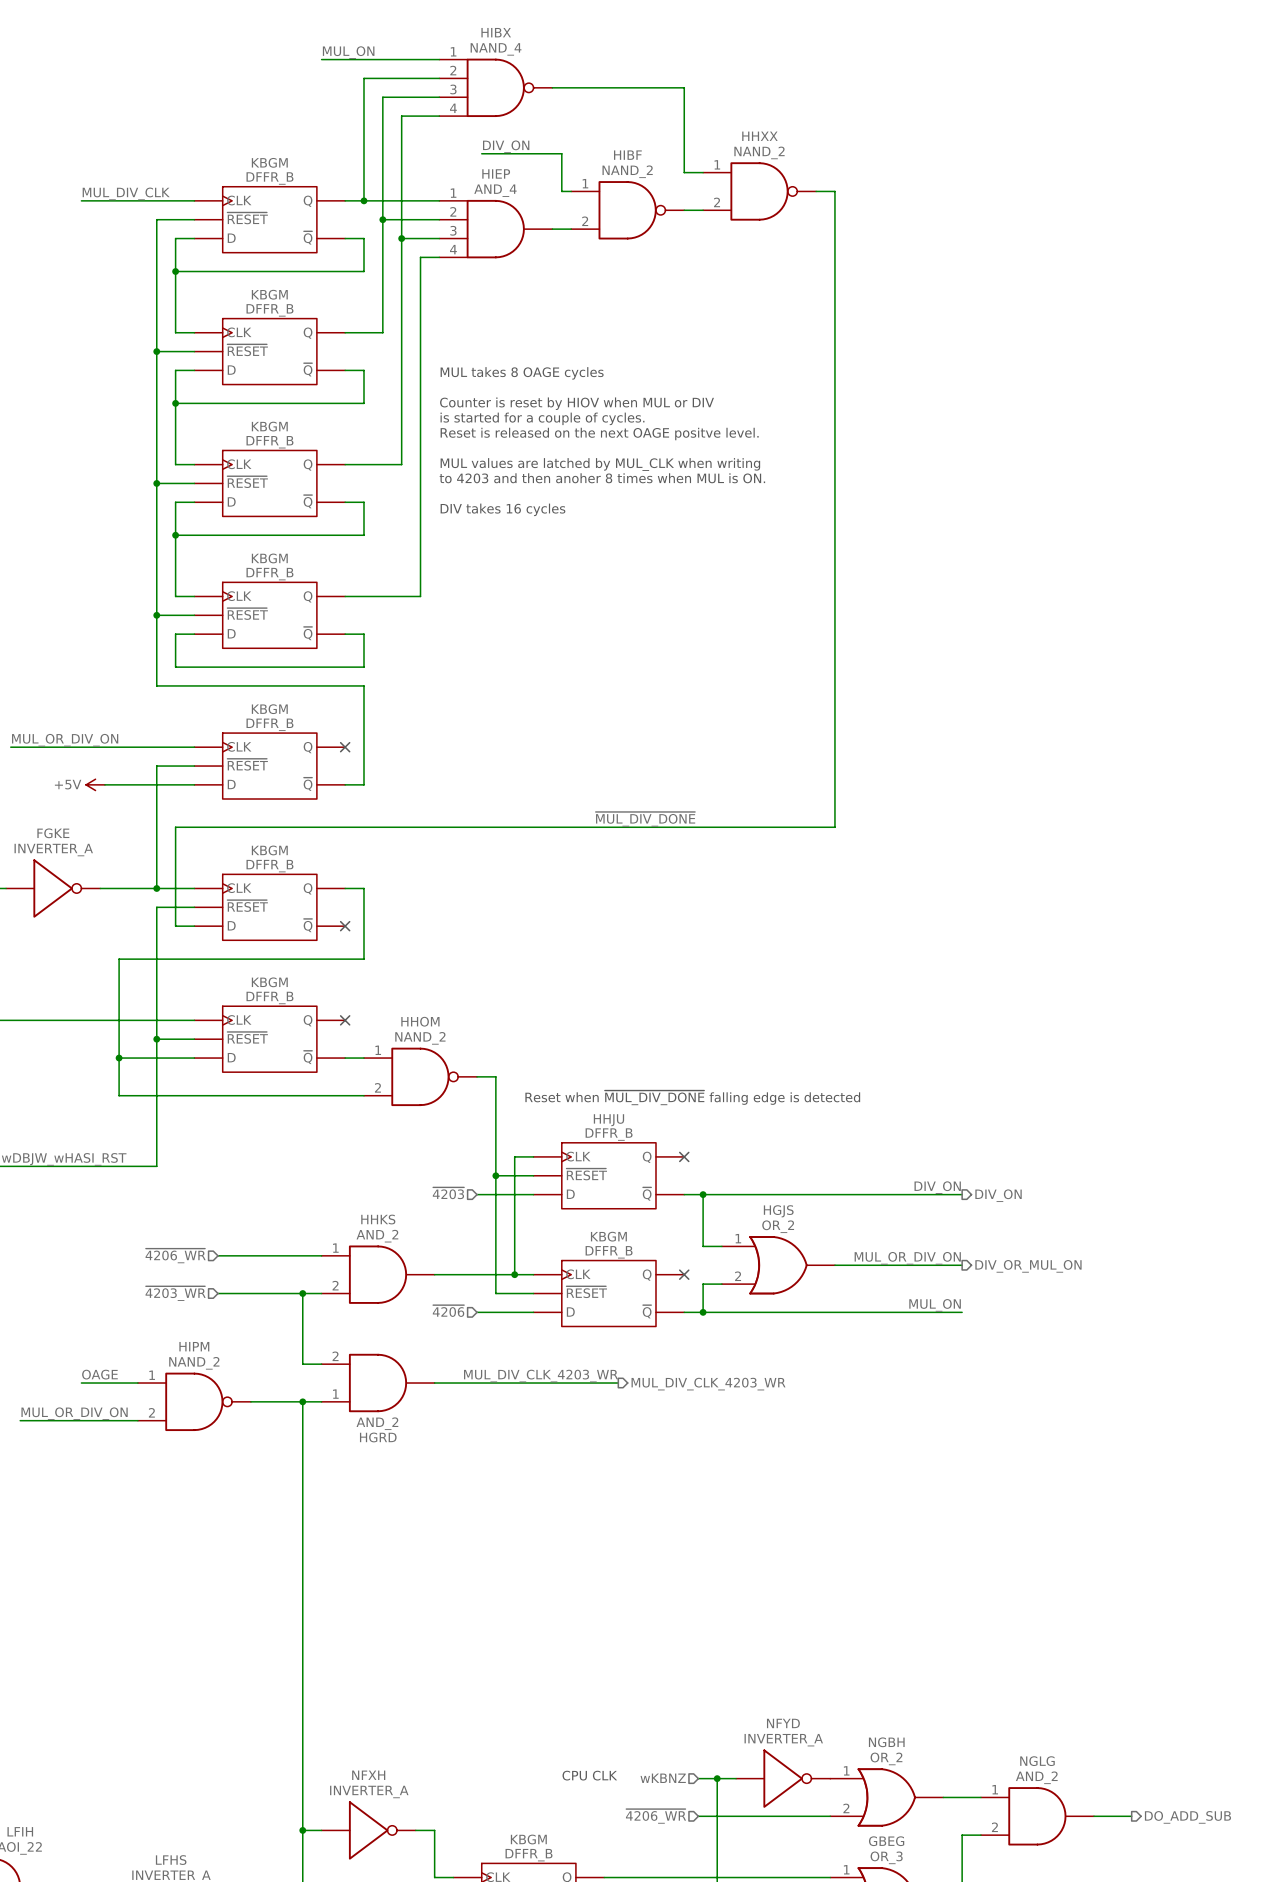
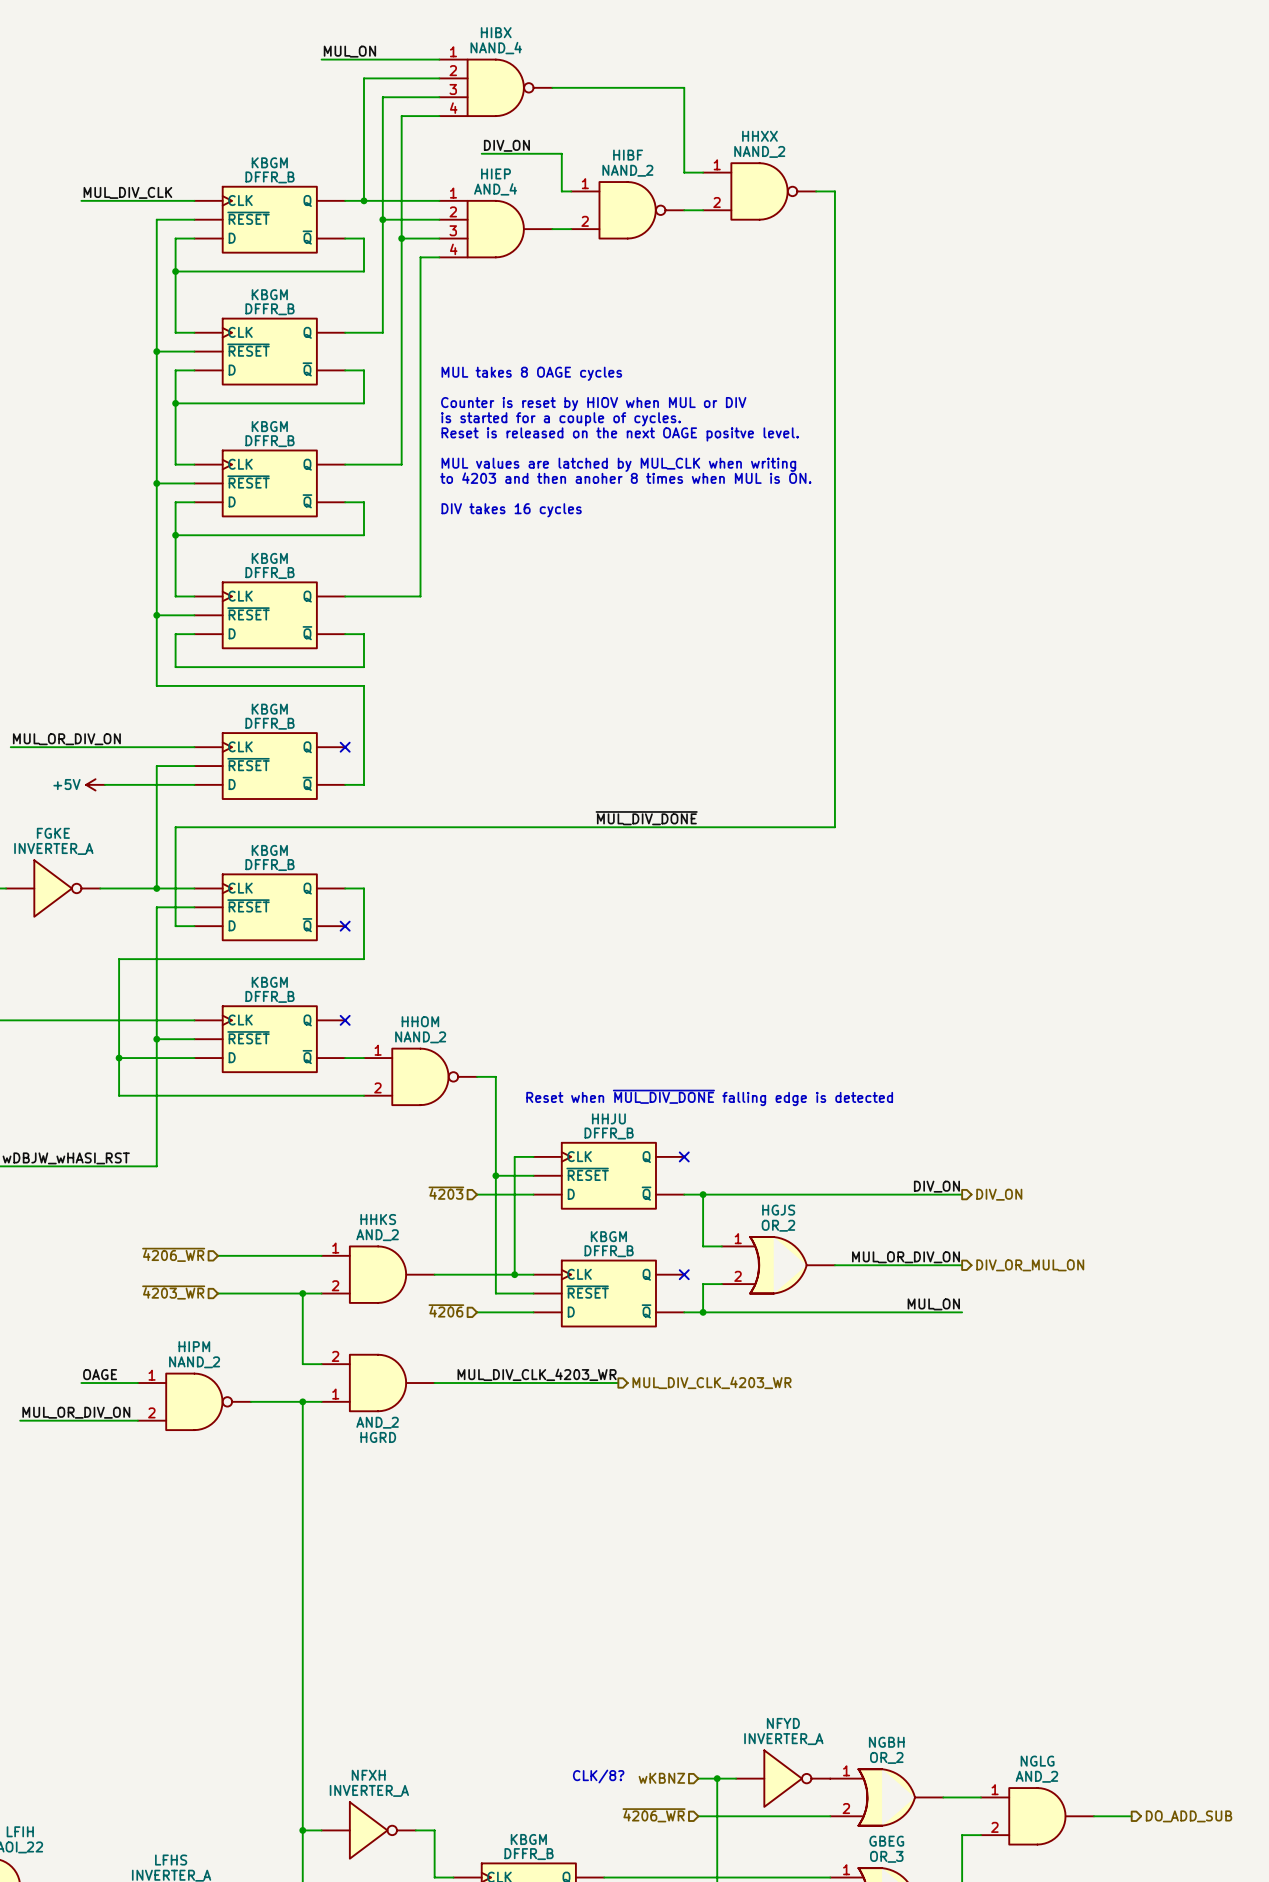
text: CPU CLK (589, 1775) -> none
text: none -> CLK/8? (598, 1776)

